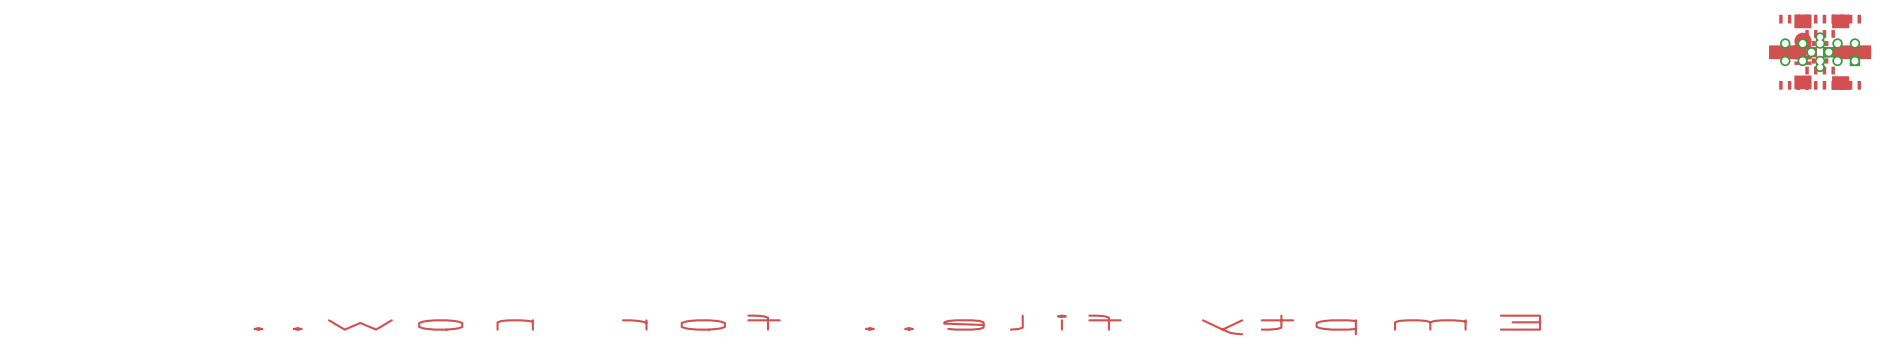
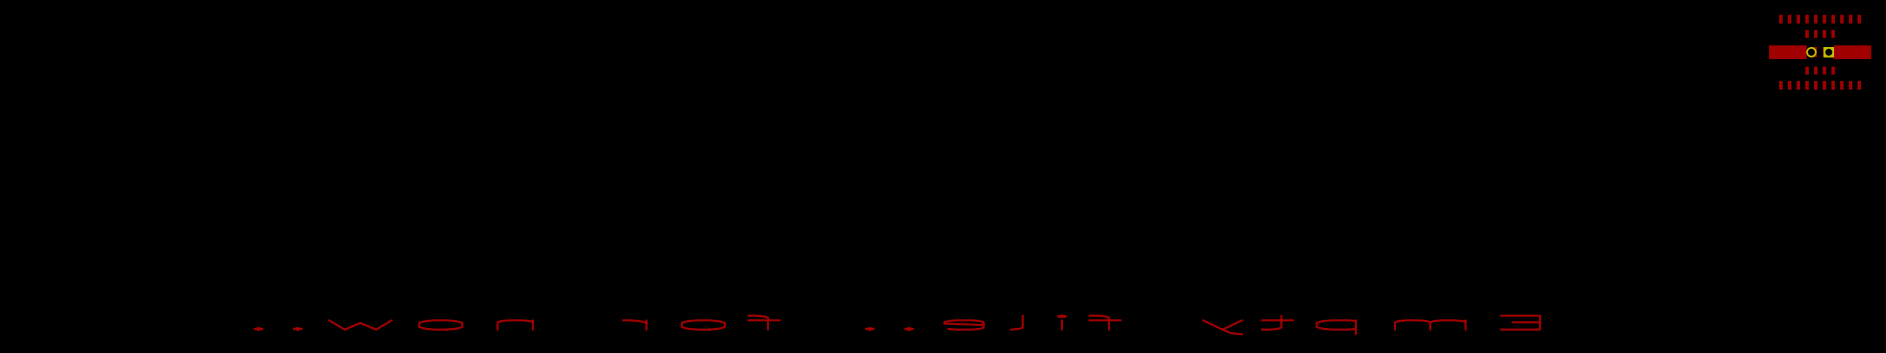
part: (1820, 52) -> none
part: (1820, 52) -> none
part: (1821, 52) -> none

